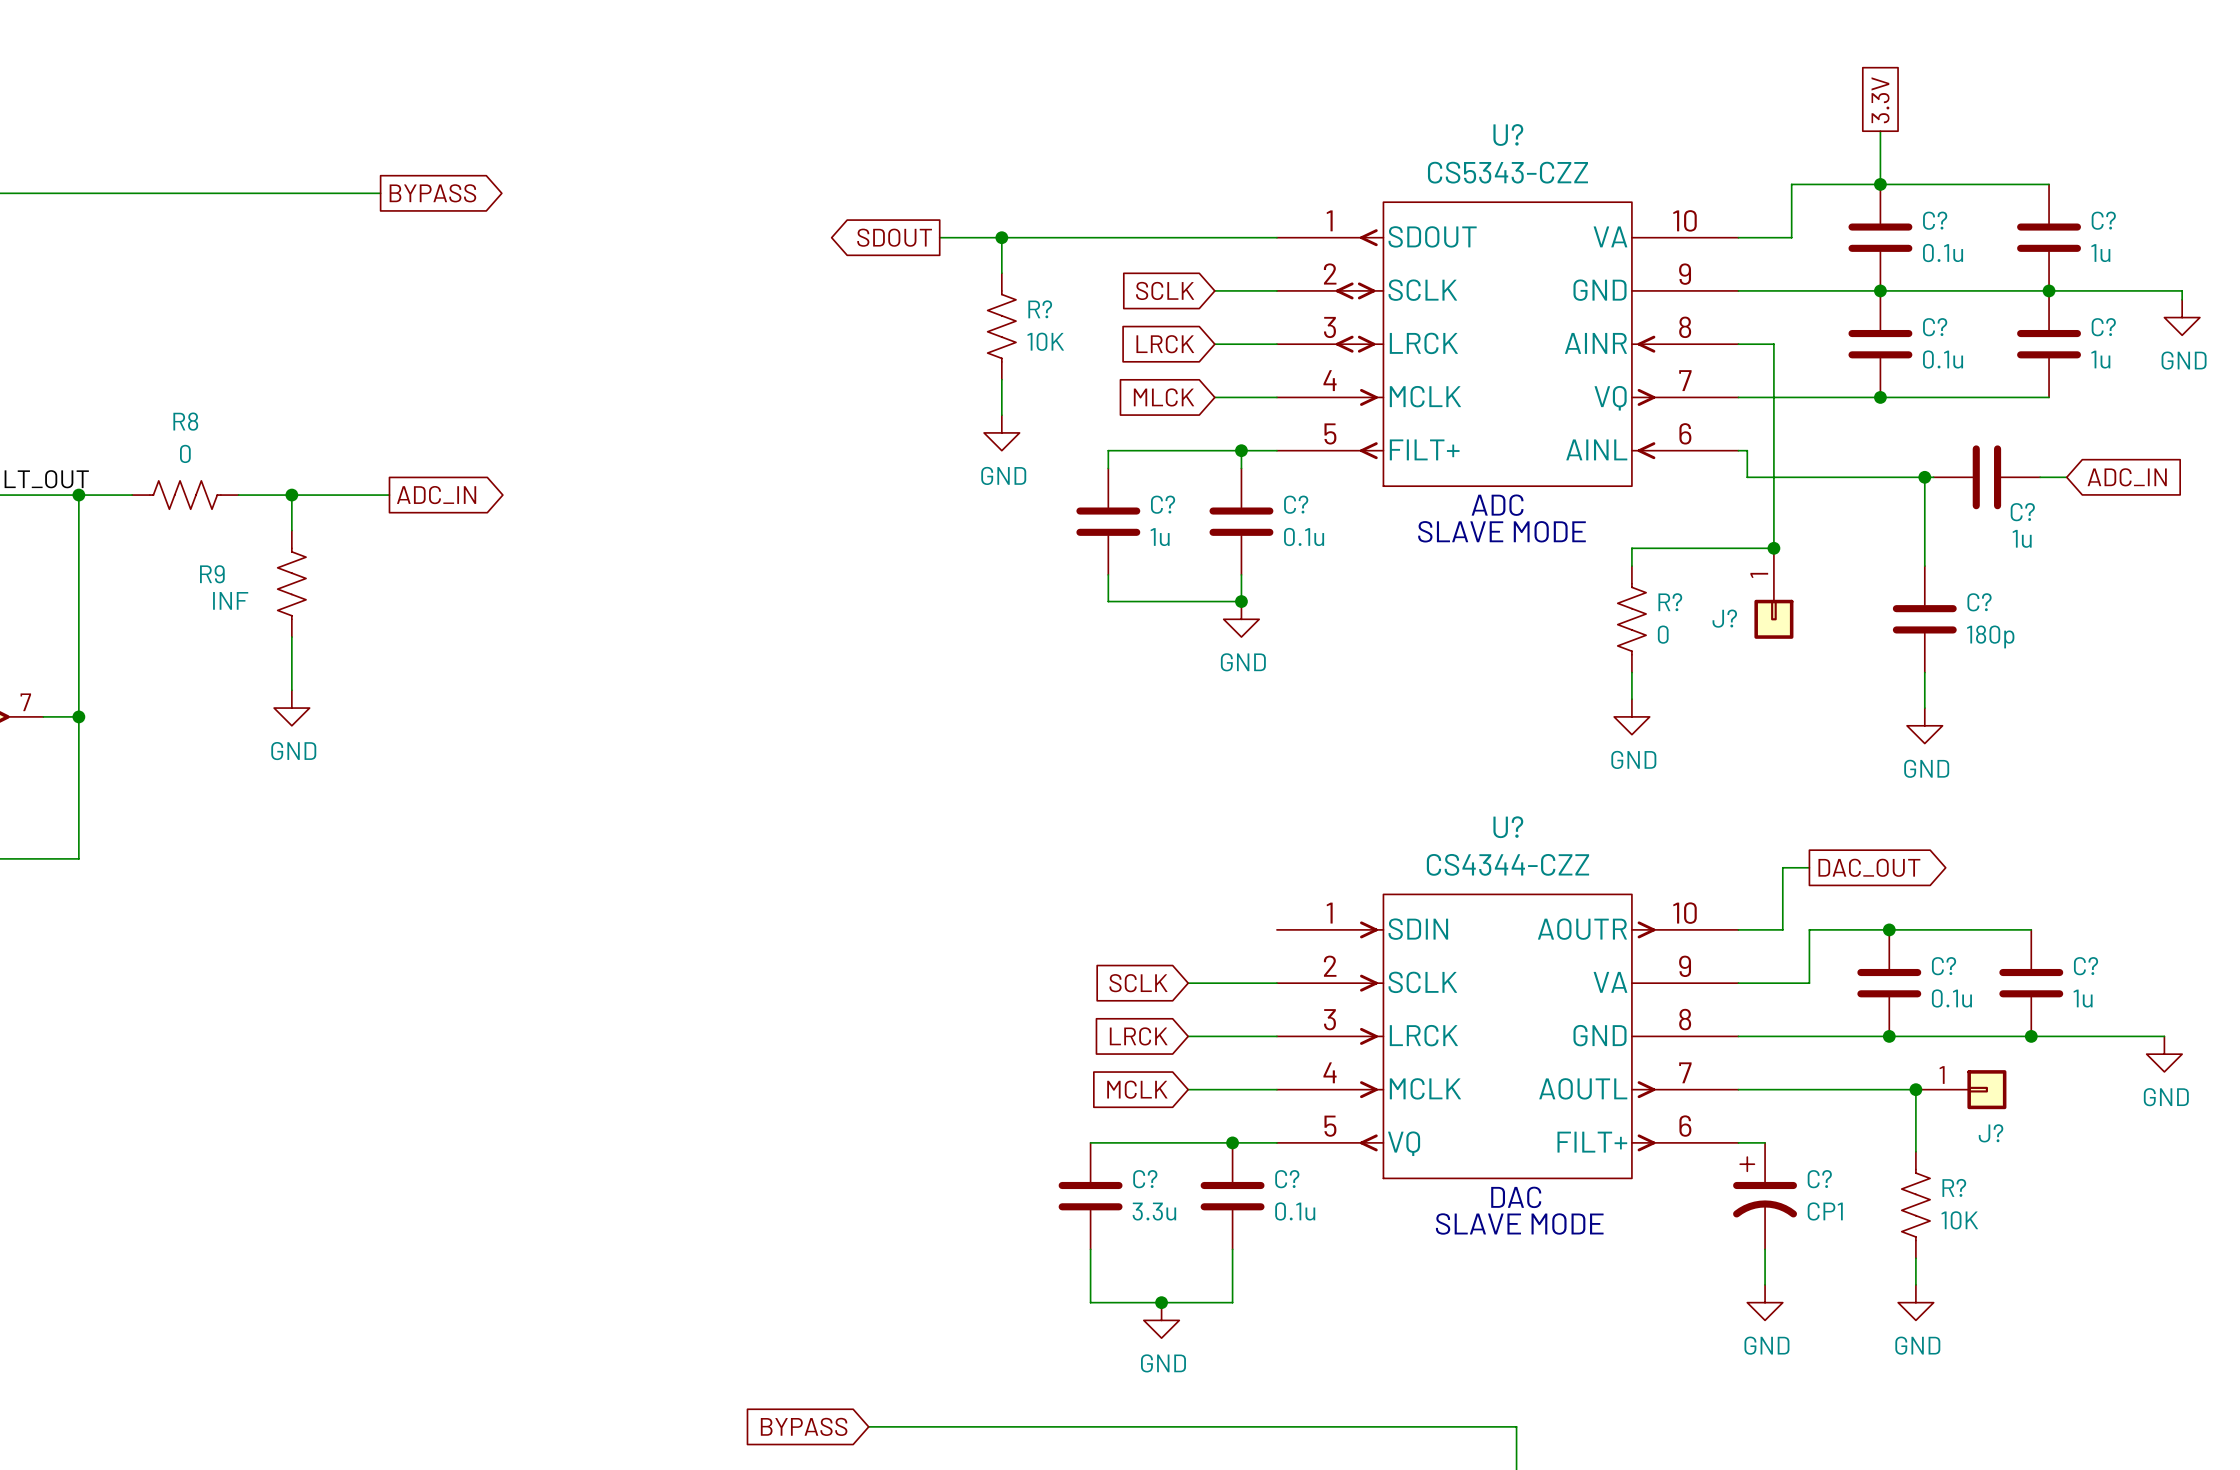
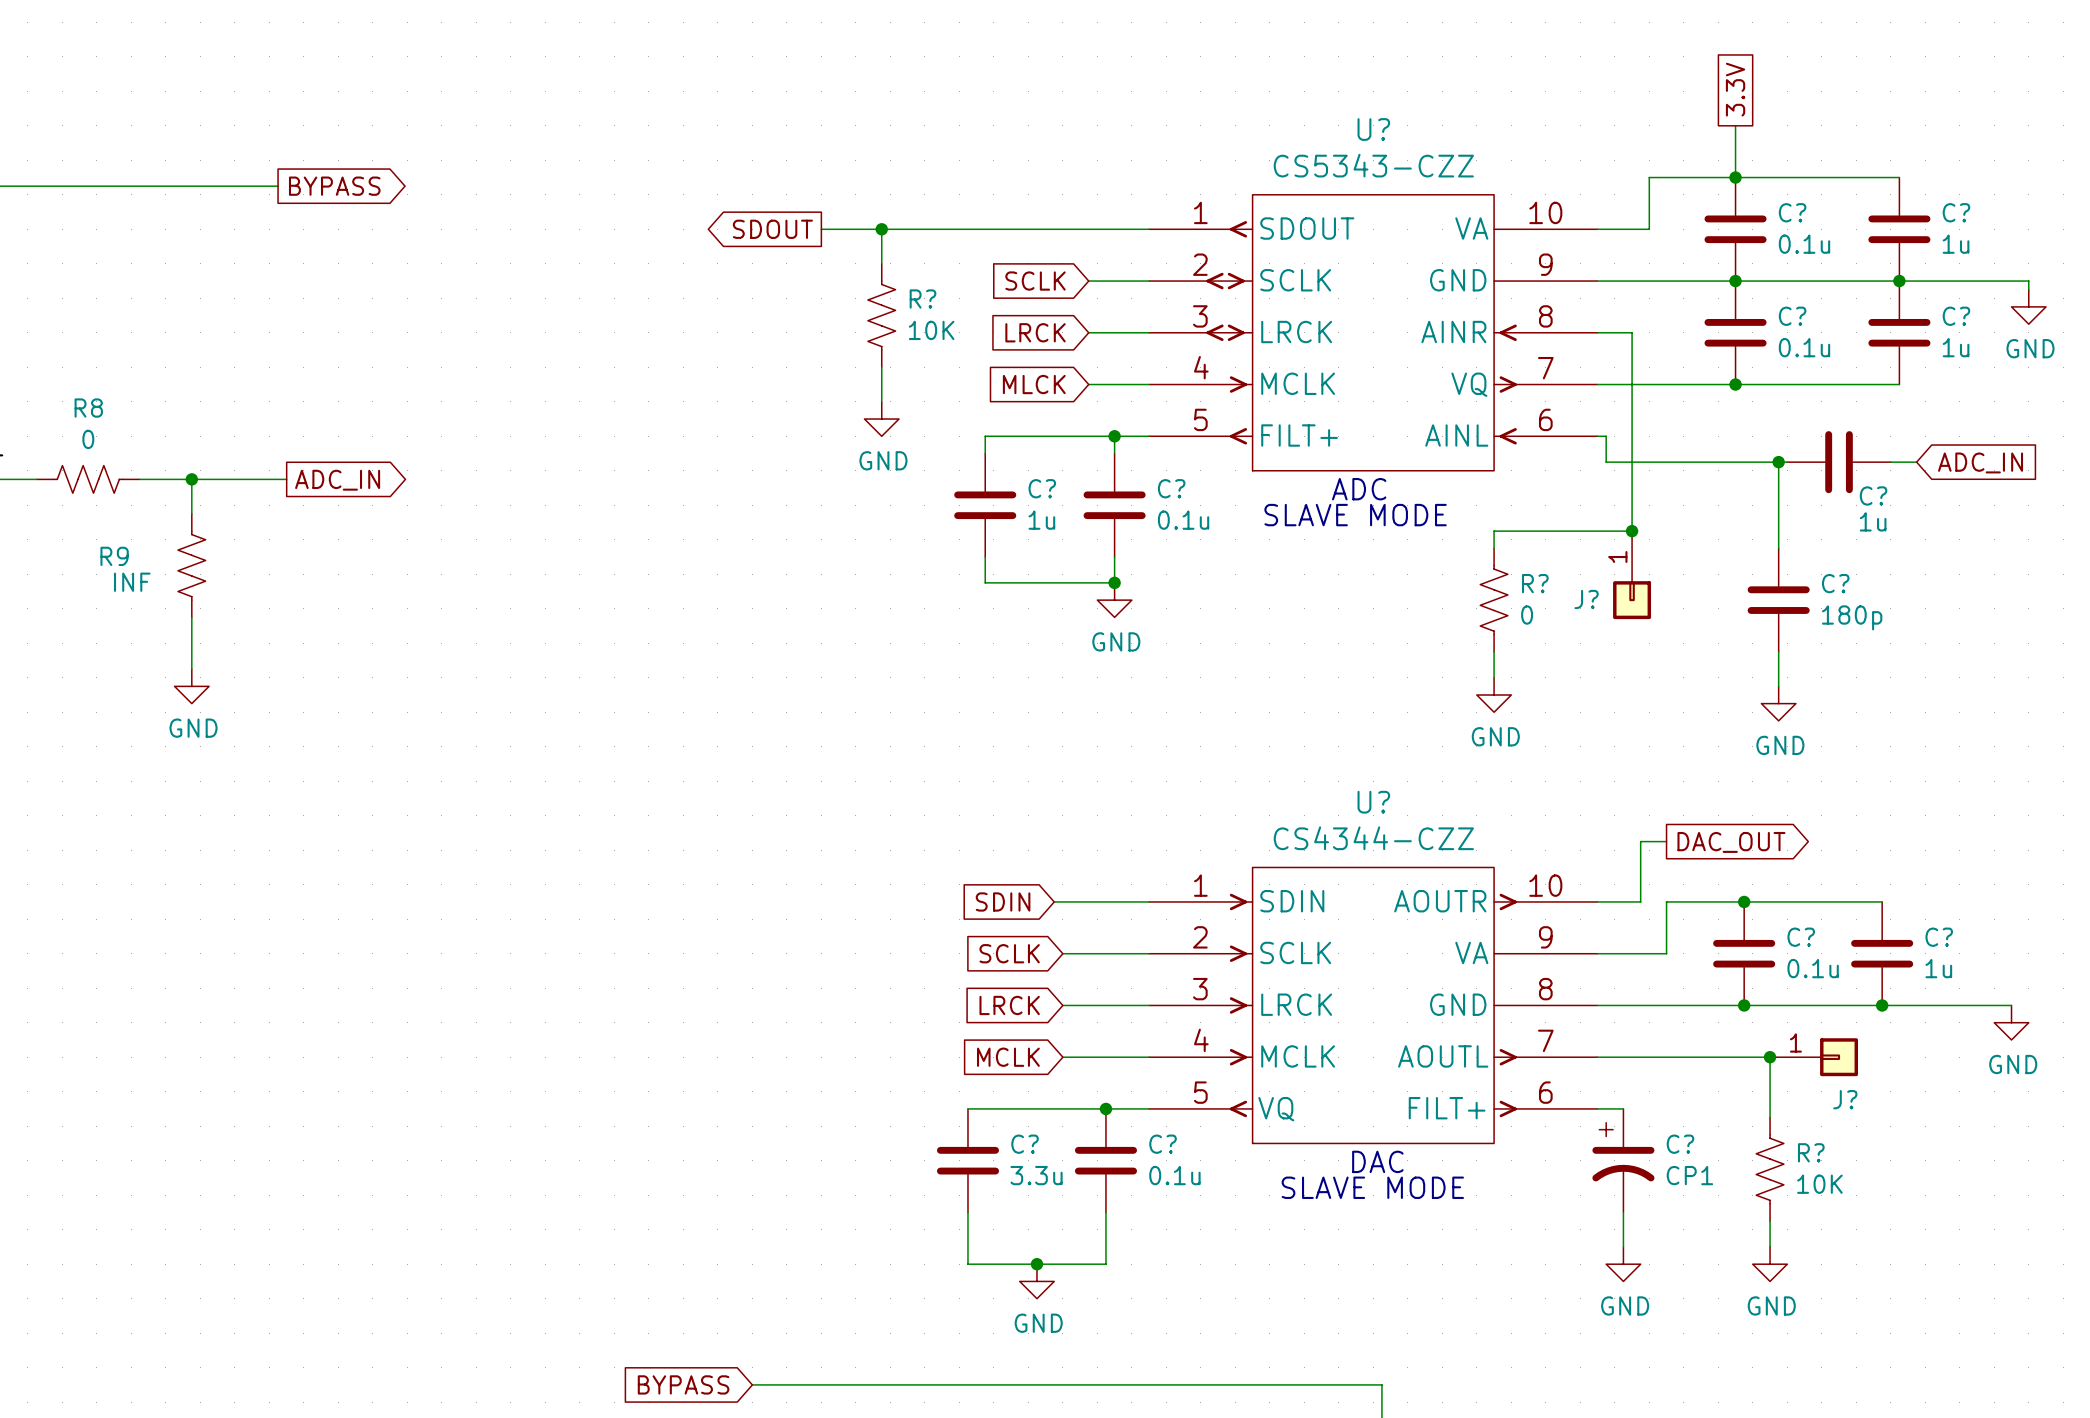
global label: none -> SDIN (1003, 901)
wire: none -> (1054, 901) (1149, 901)

